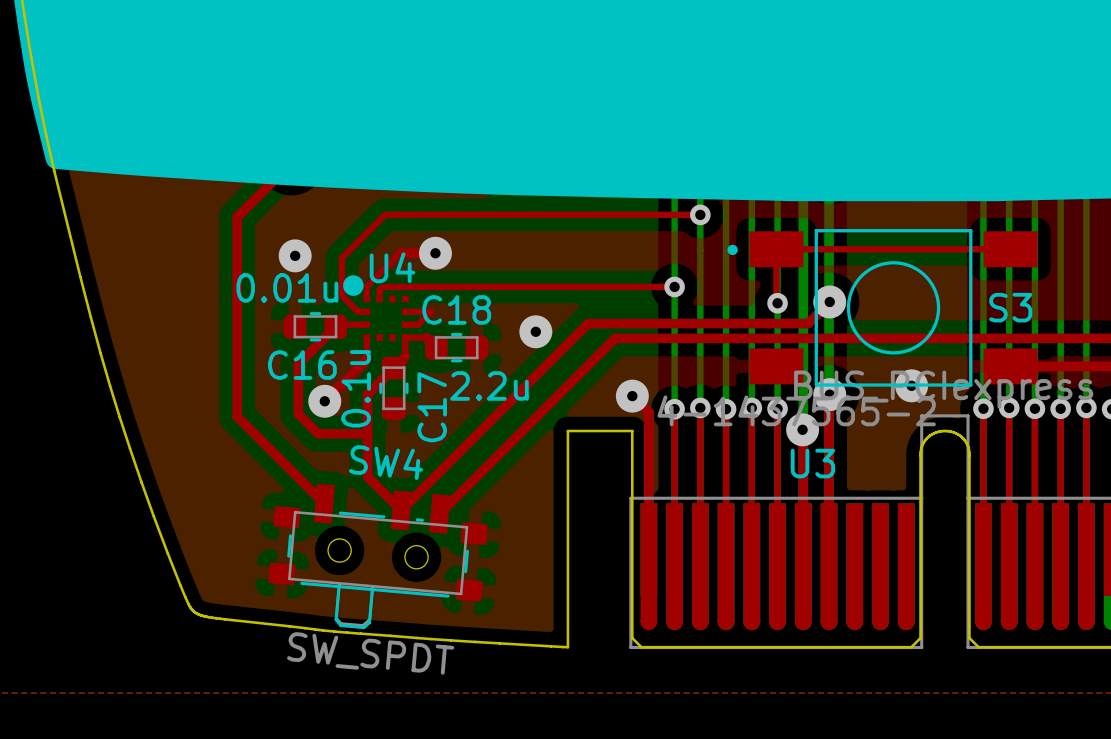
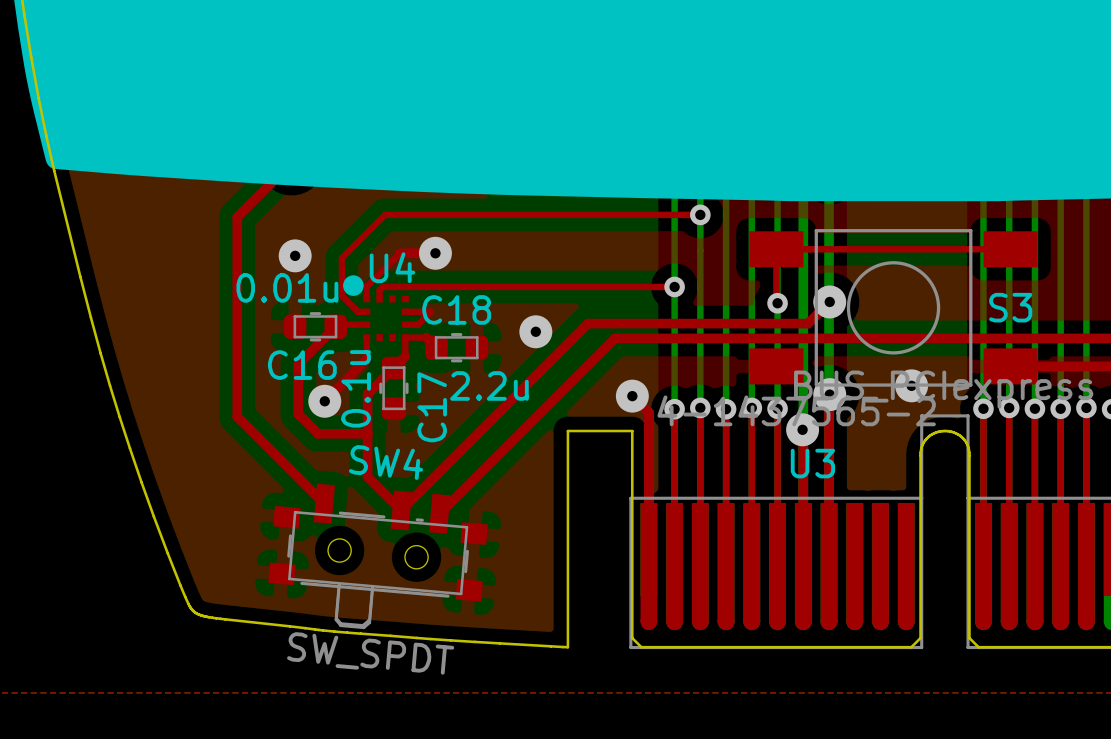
S3 footprint: [727, 229, 1038, 387] -> [749, 229, 1038, 387]
C16 footprint: [283, 312, 347, 342] -> [283, 312, 347, 342]
C18 footprint: [425, 333, 489, 363] -> [425, 333, 489, 363]
C17 footprint: [379, 356, 409, 420] -> [379, 356, 409, 420]
SW4 footprint: [268, 483, 488, 630] -> [268, 483, 488, 630]

